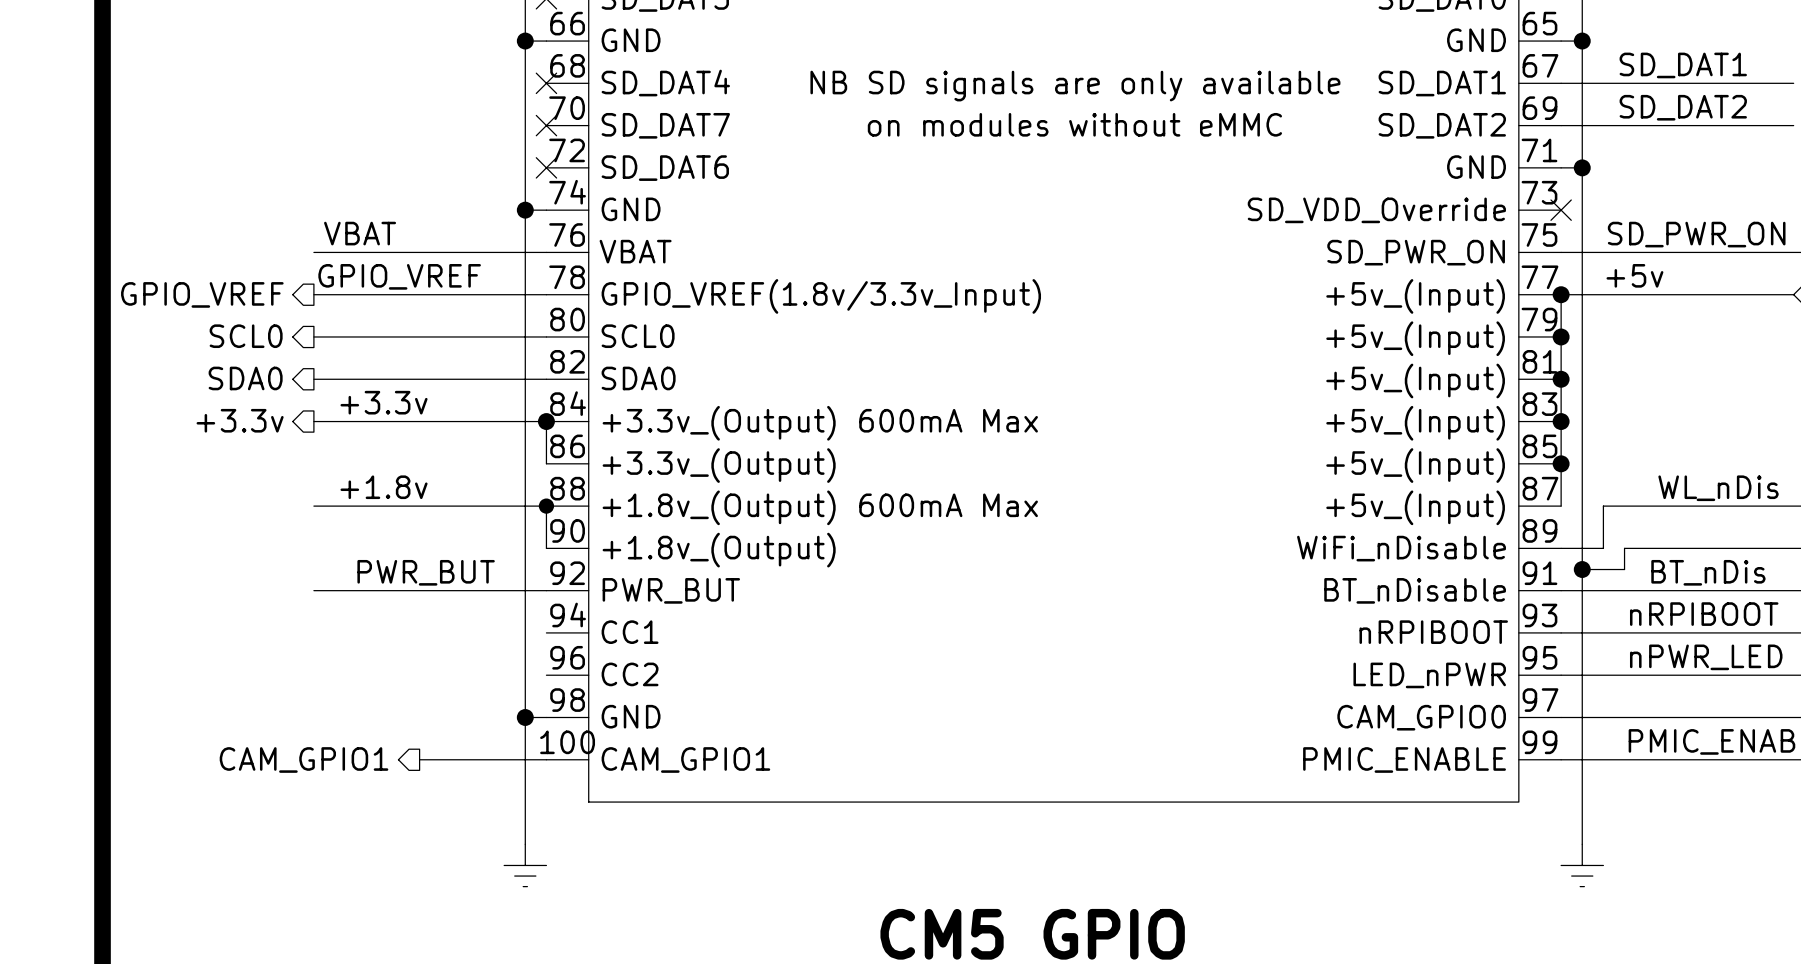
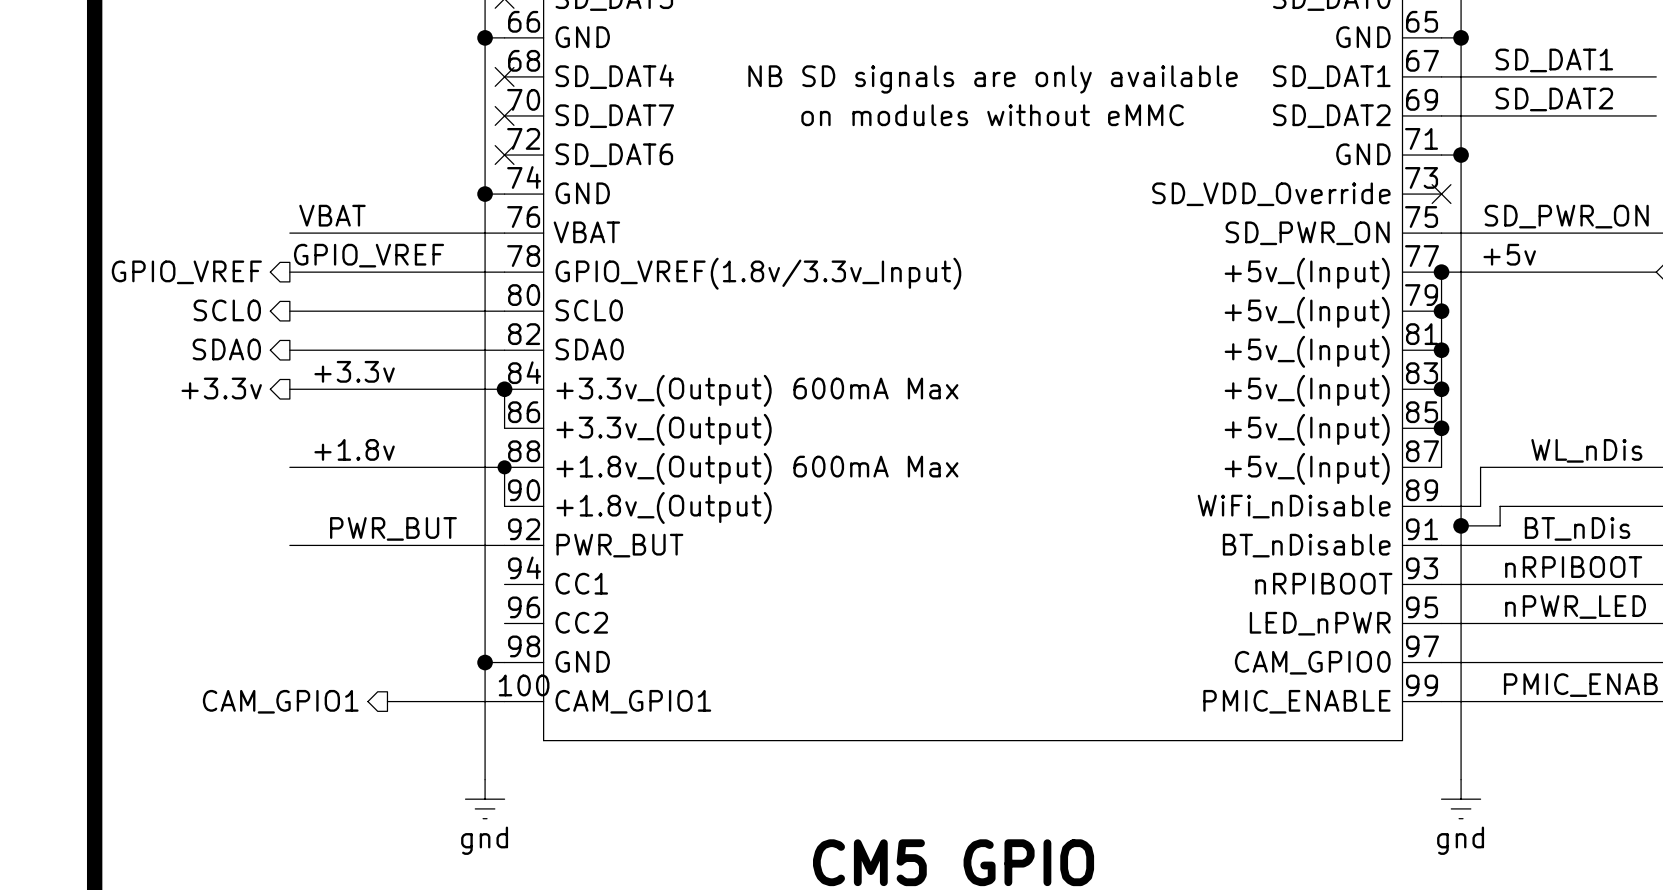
power symbol text: none -> gnd (484, 840)
power symbol text: none -> gnd (1460, 840)

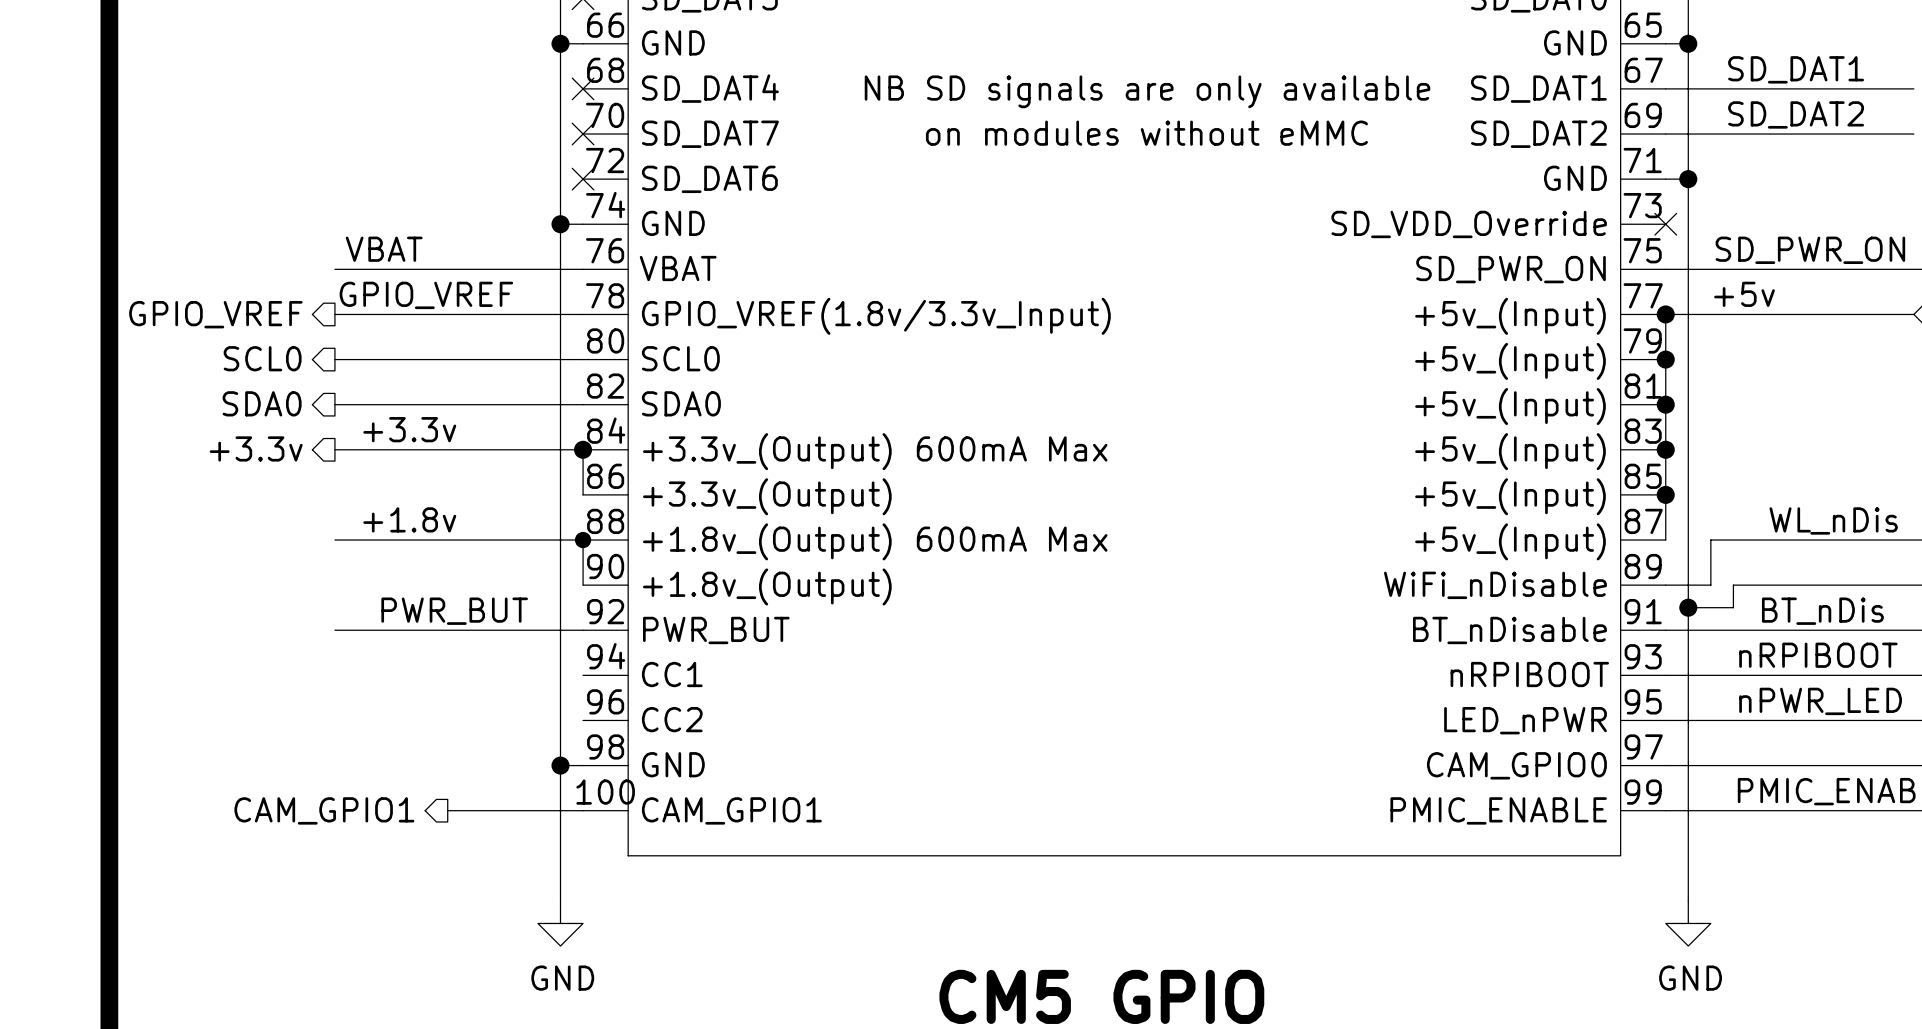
power symbol: gnd (485, 799) -> GND (560, 923)
power symbol: gnd (1461, 799) -> GND (1688, 923)

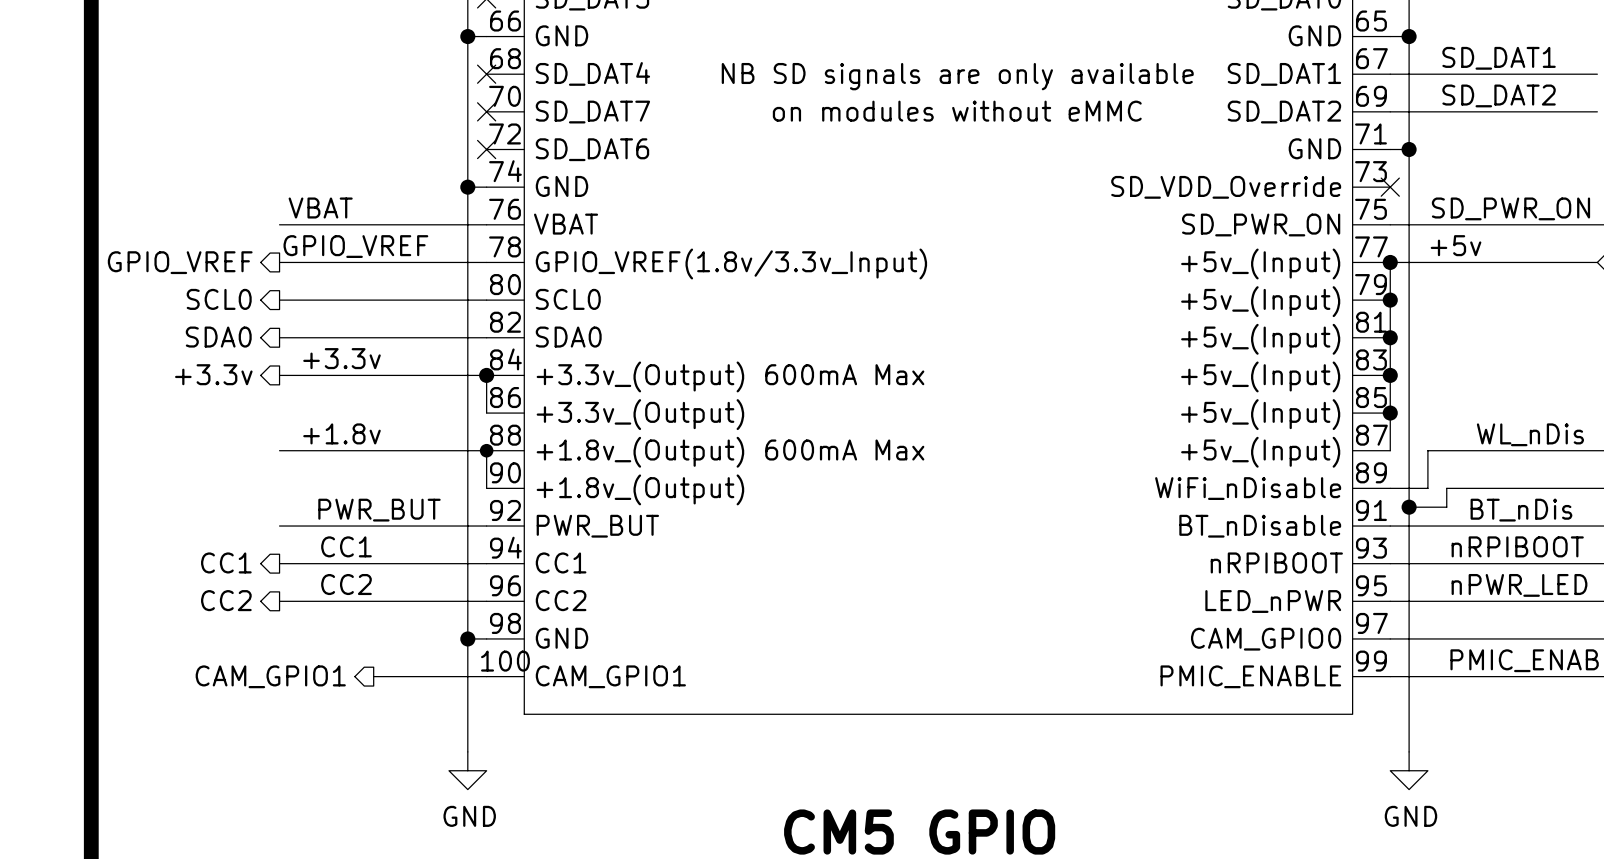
label: none -> CC1 (346, 546)
hierarchical label: none -> CC1 (226, 562)
wire: none -> (279, 563) (486, 563)
label: none -> CC2 (346, 584)
hierarchical label: none -> CC2 (226, 600)
wire: none -> (279, 601) (486, 601)

